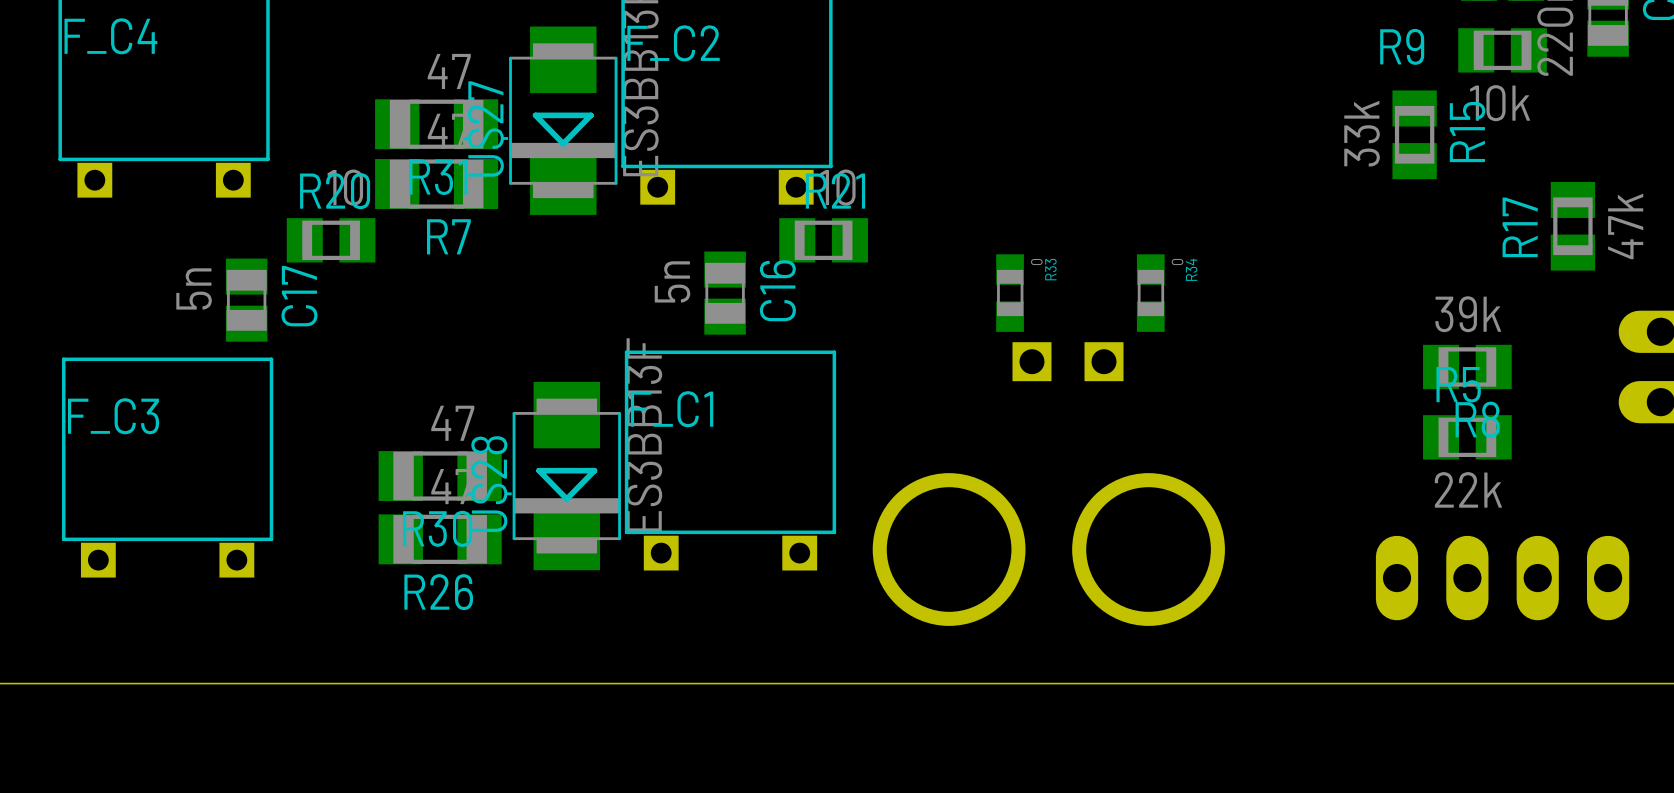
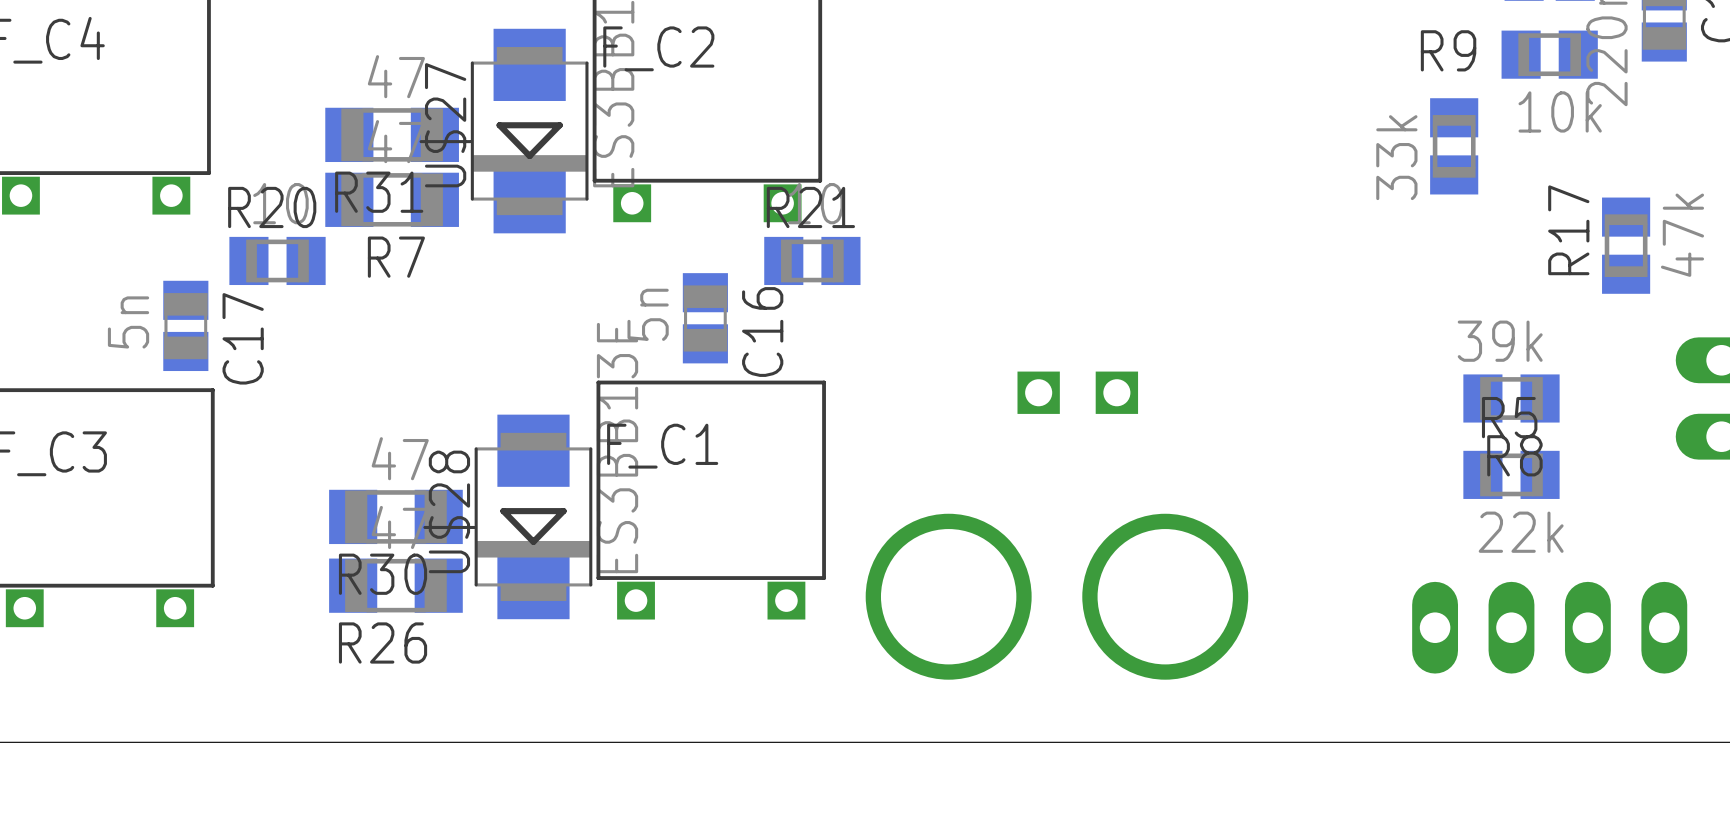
R15 name: R15 (1467, 131) -> none
R33: 0 (1010, 293) -> none
R34: 0 (1150, 293) -> none

